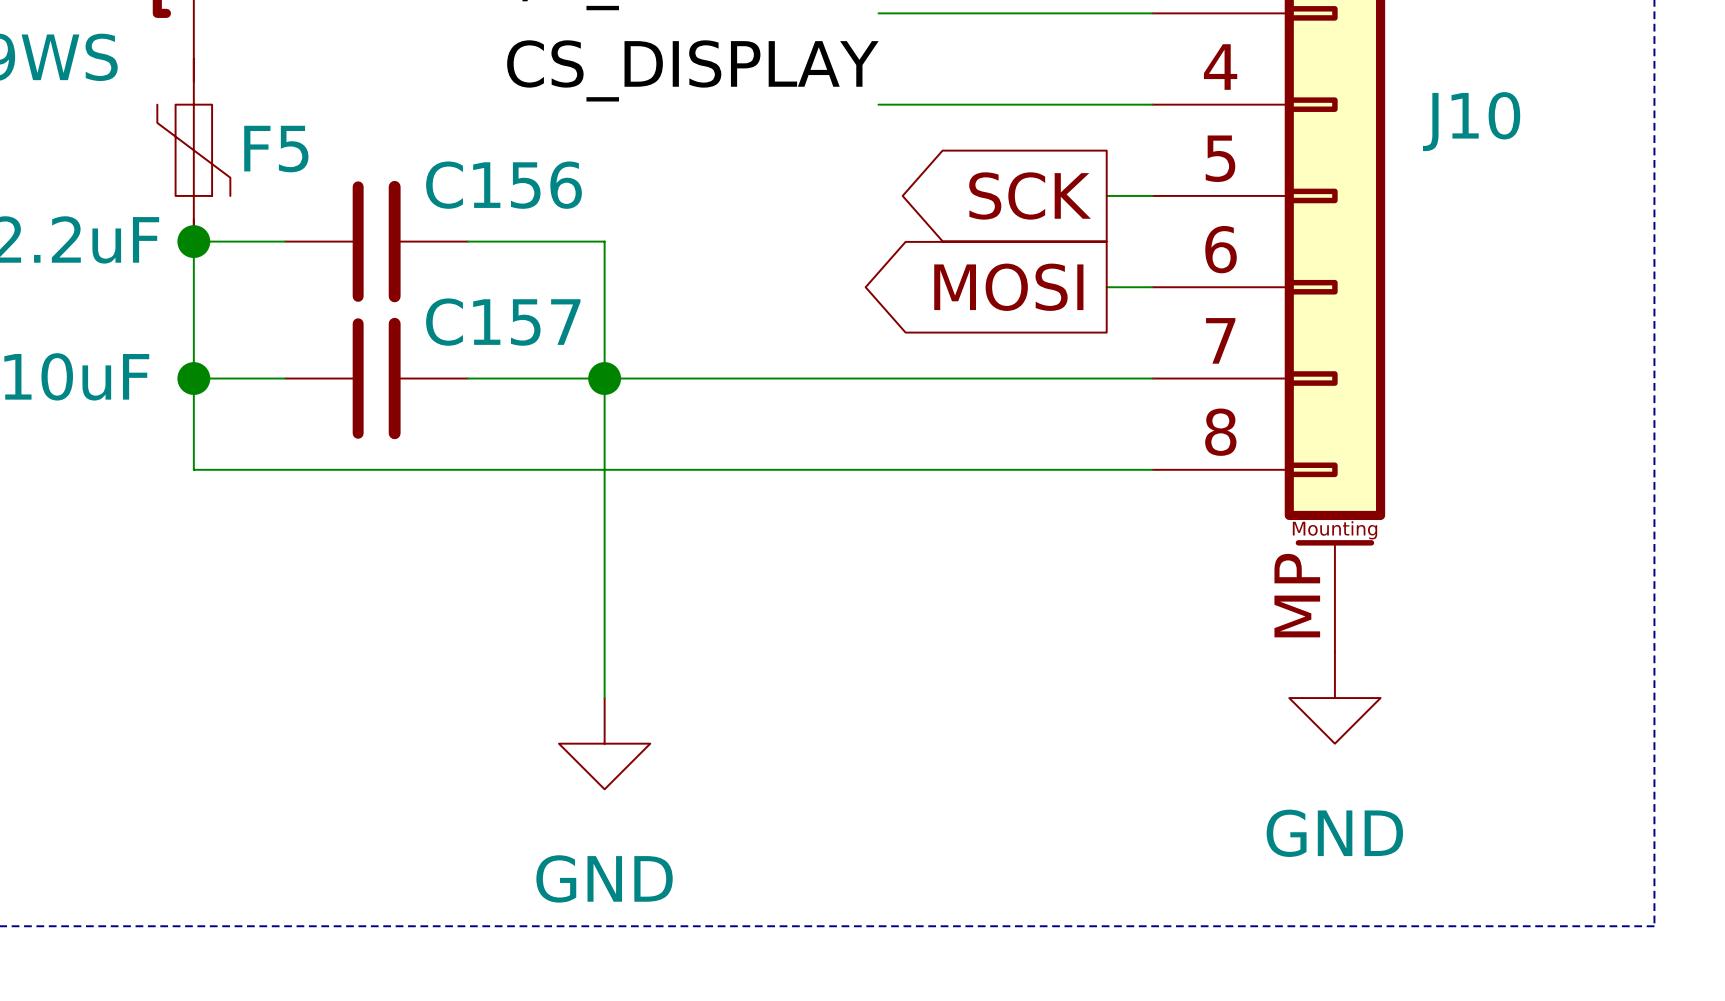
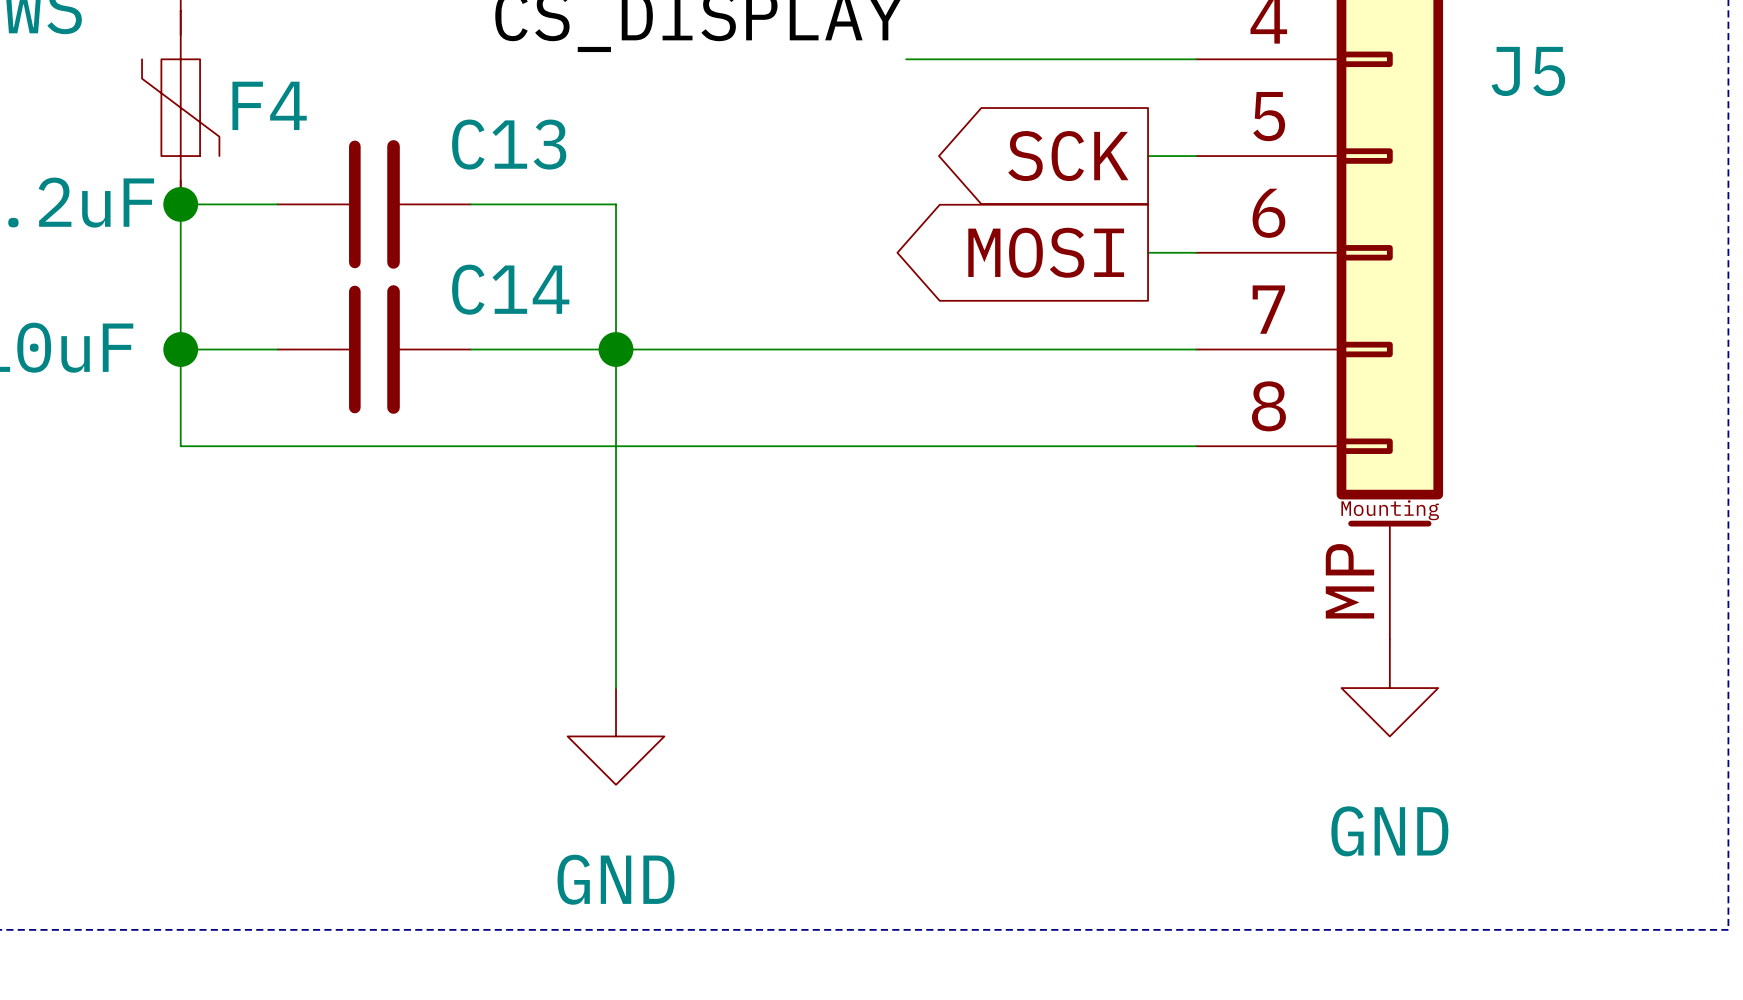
J10 name: J10 (1471, 121) -> J5 (1528, 71)
F5 name: F5 (276, 149) -> F4 (269, 105)
C156 name: C156 (504, 185) -> C13 (509, 144)
C157 name: C157 (503, 322) -> C14 (510, 289)

